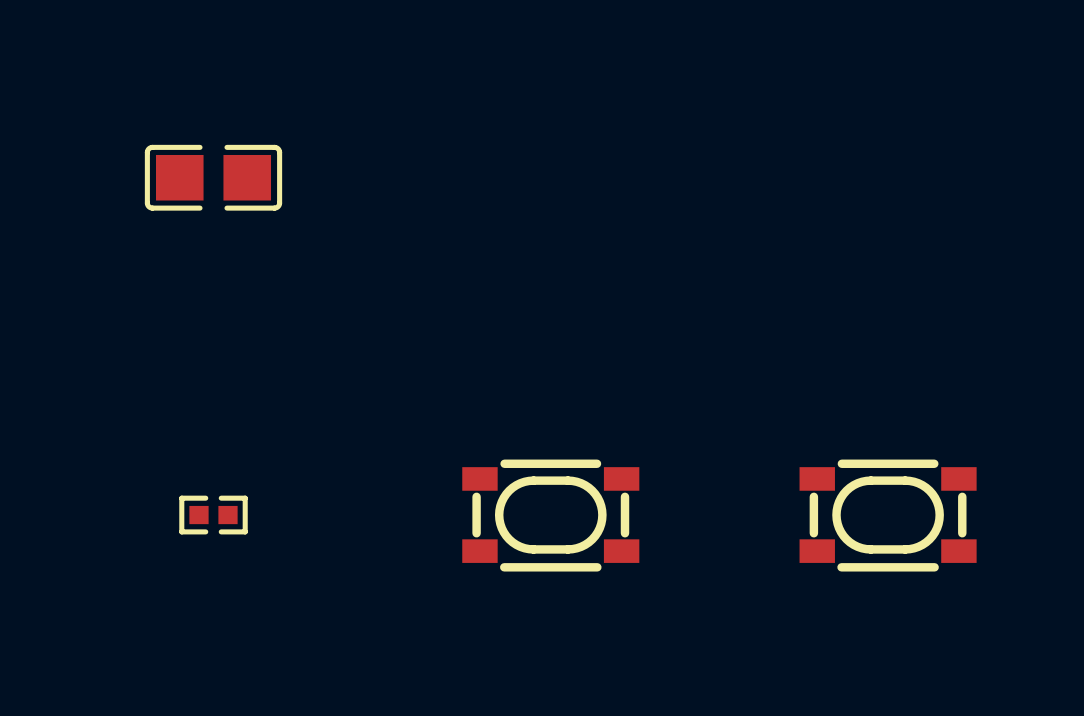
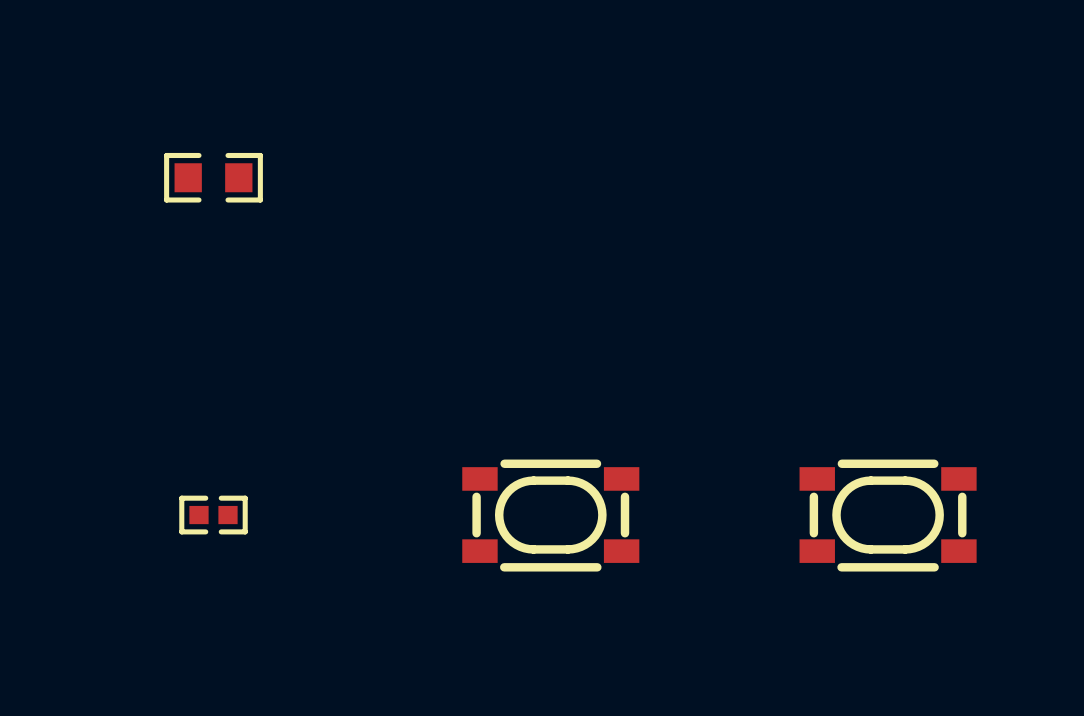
part footprint: [144, 144, 283, 211] -> [164, 152, 263, 203]

